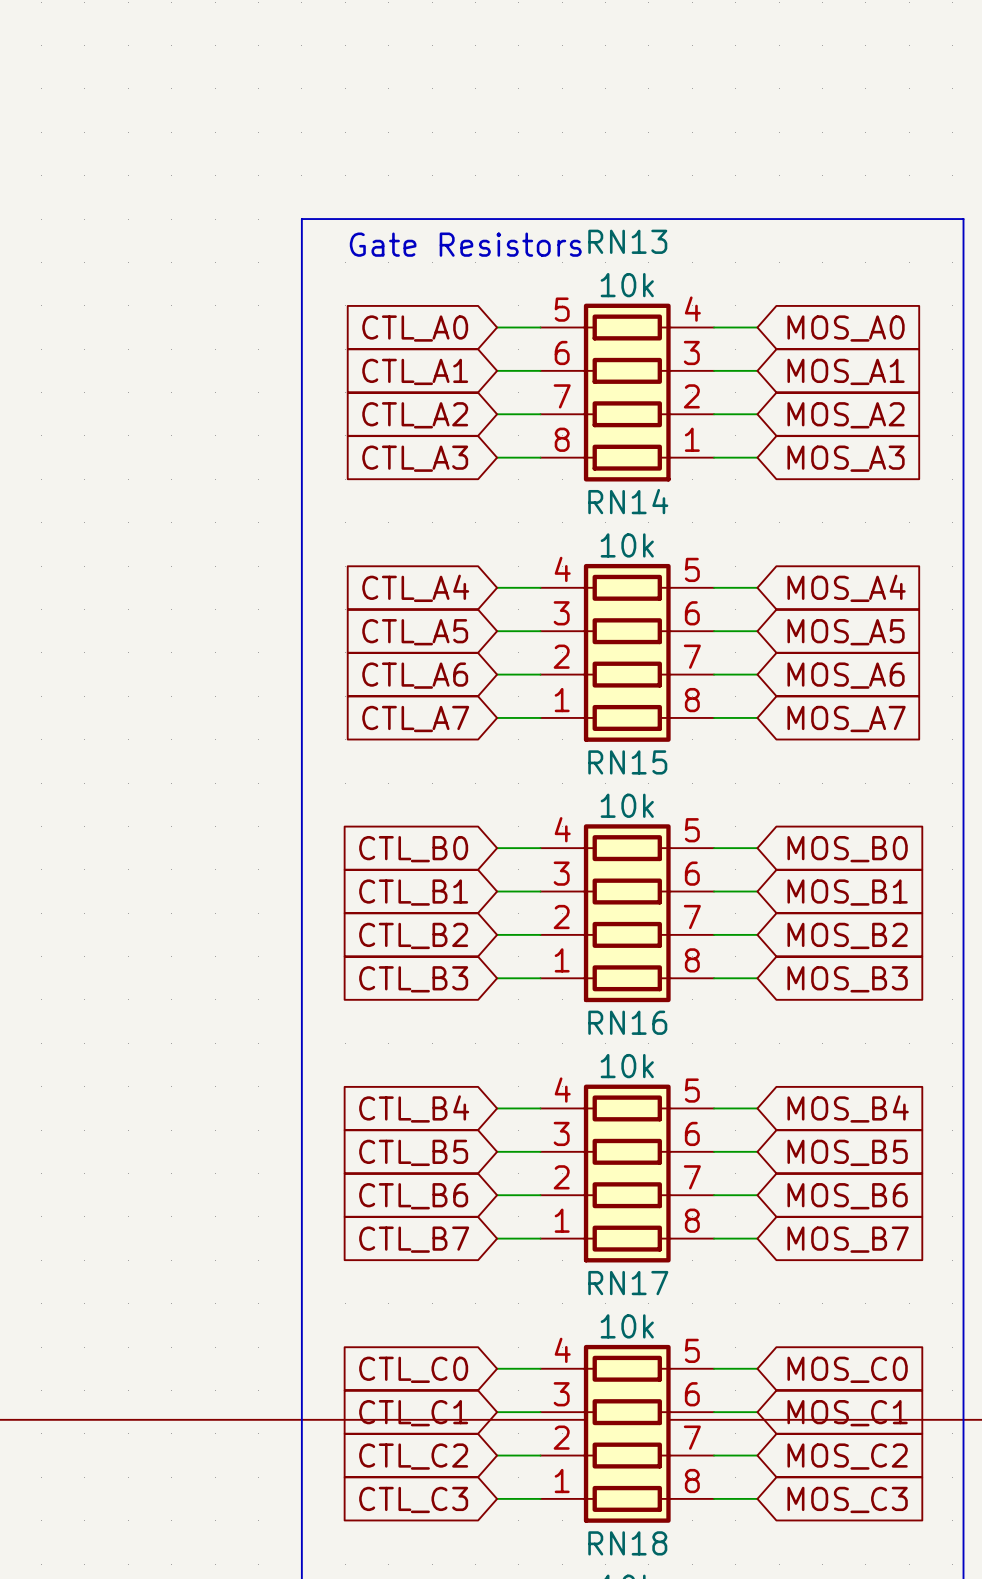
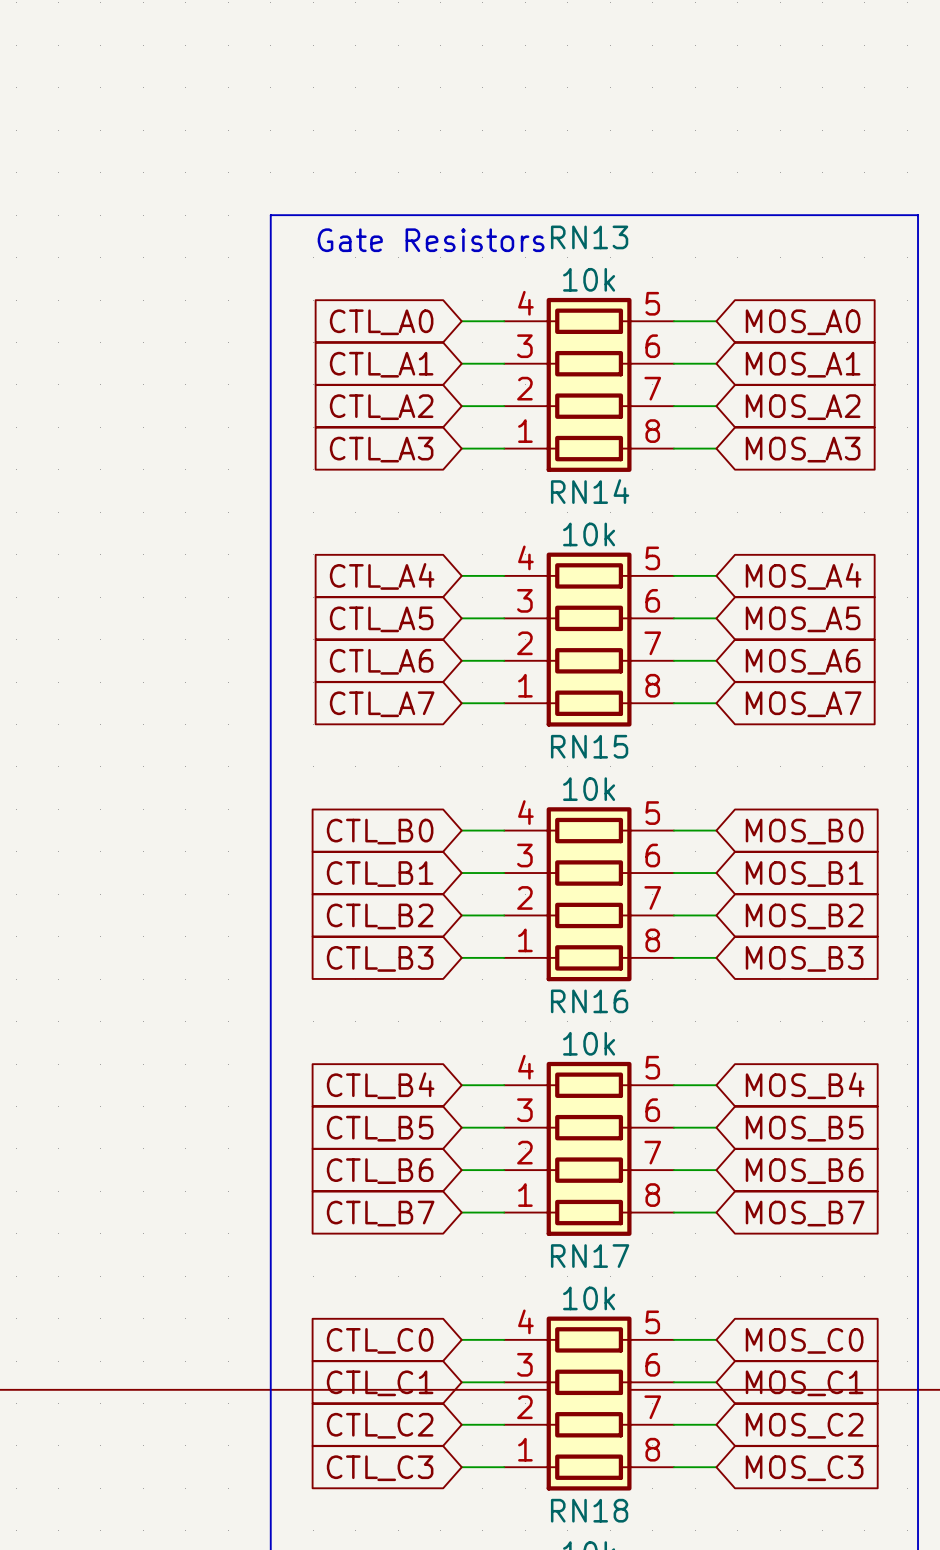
RN13 flip: as is (627, 392) -> left-right (589, 384)

